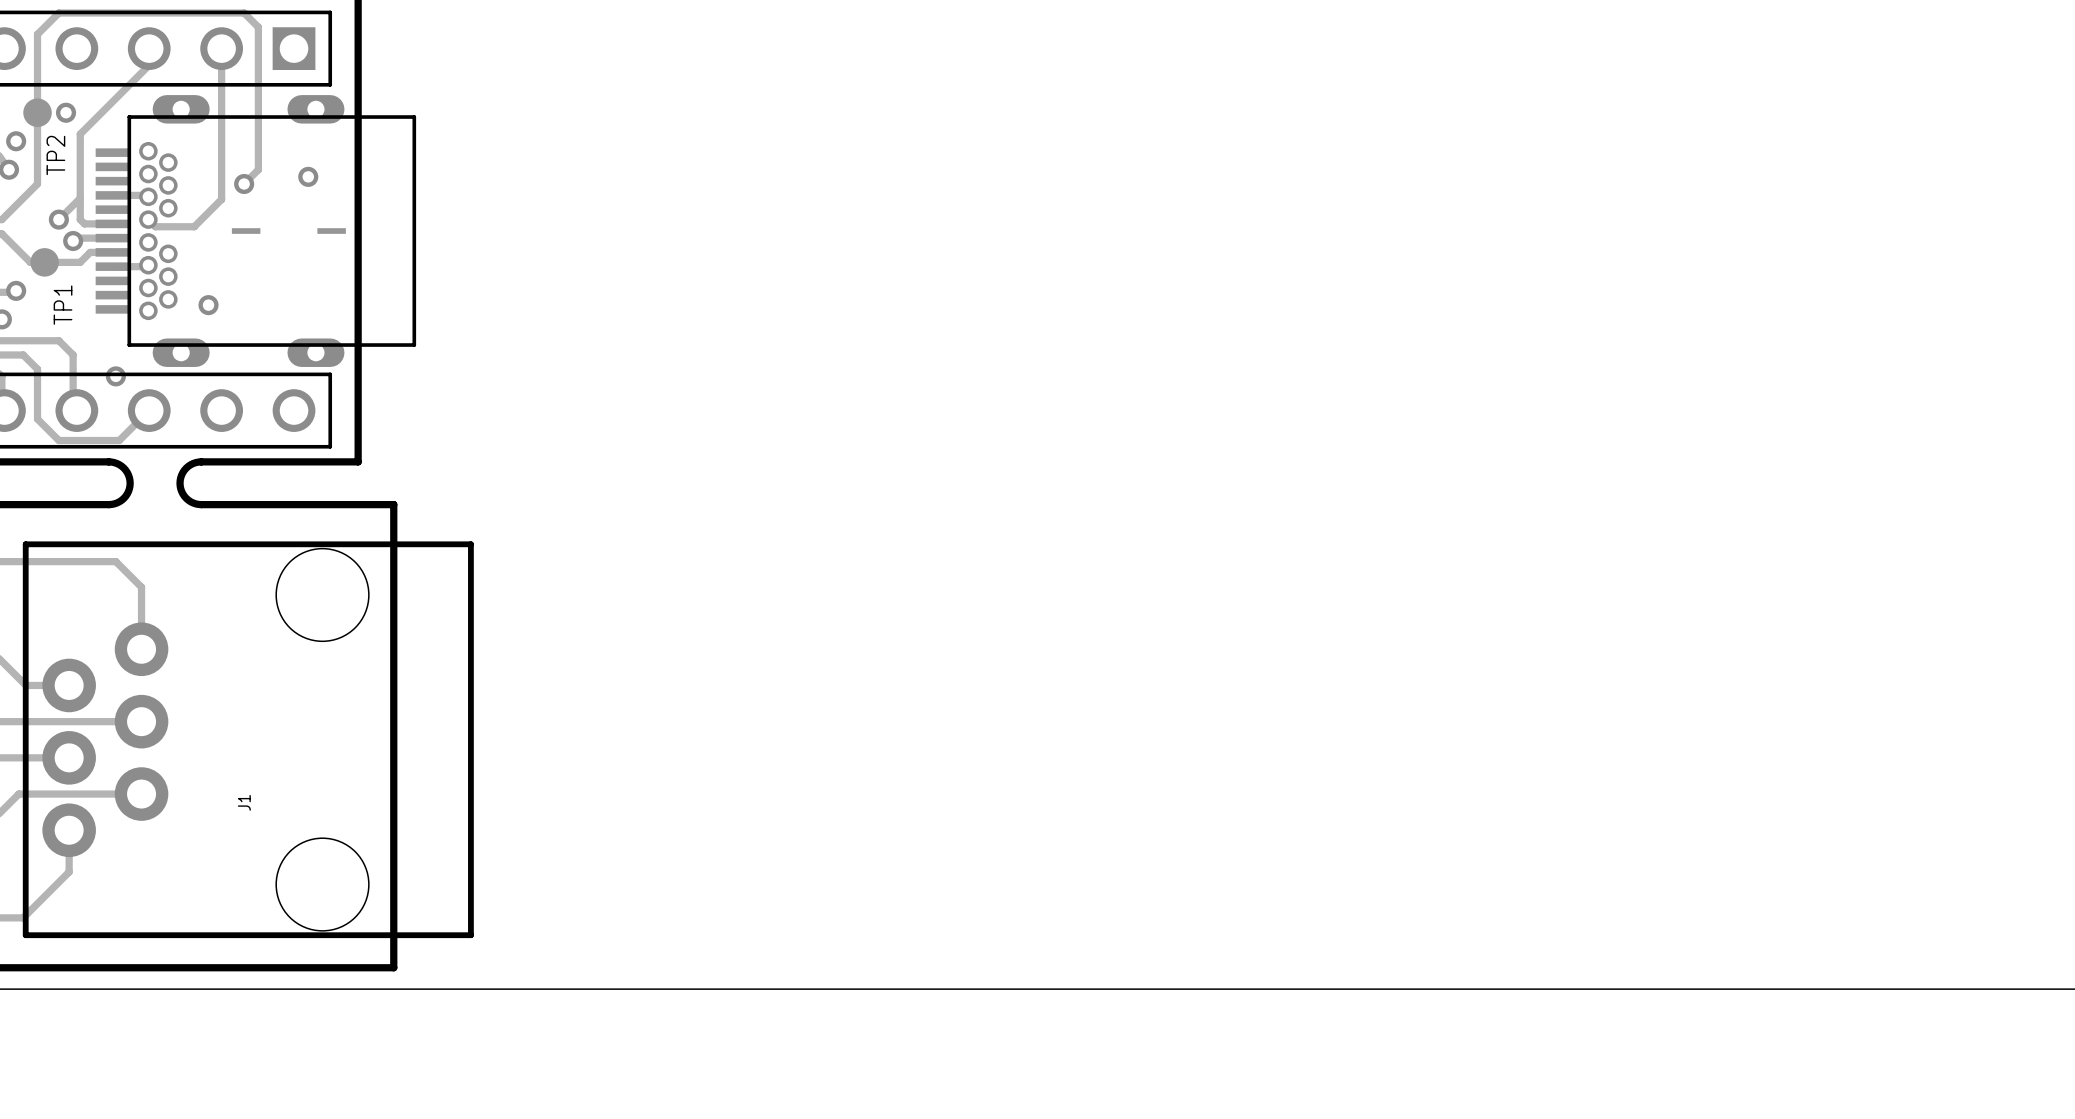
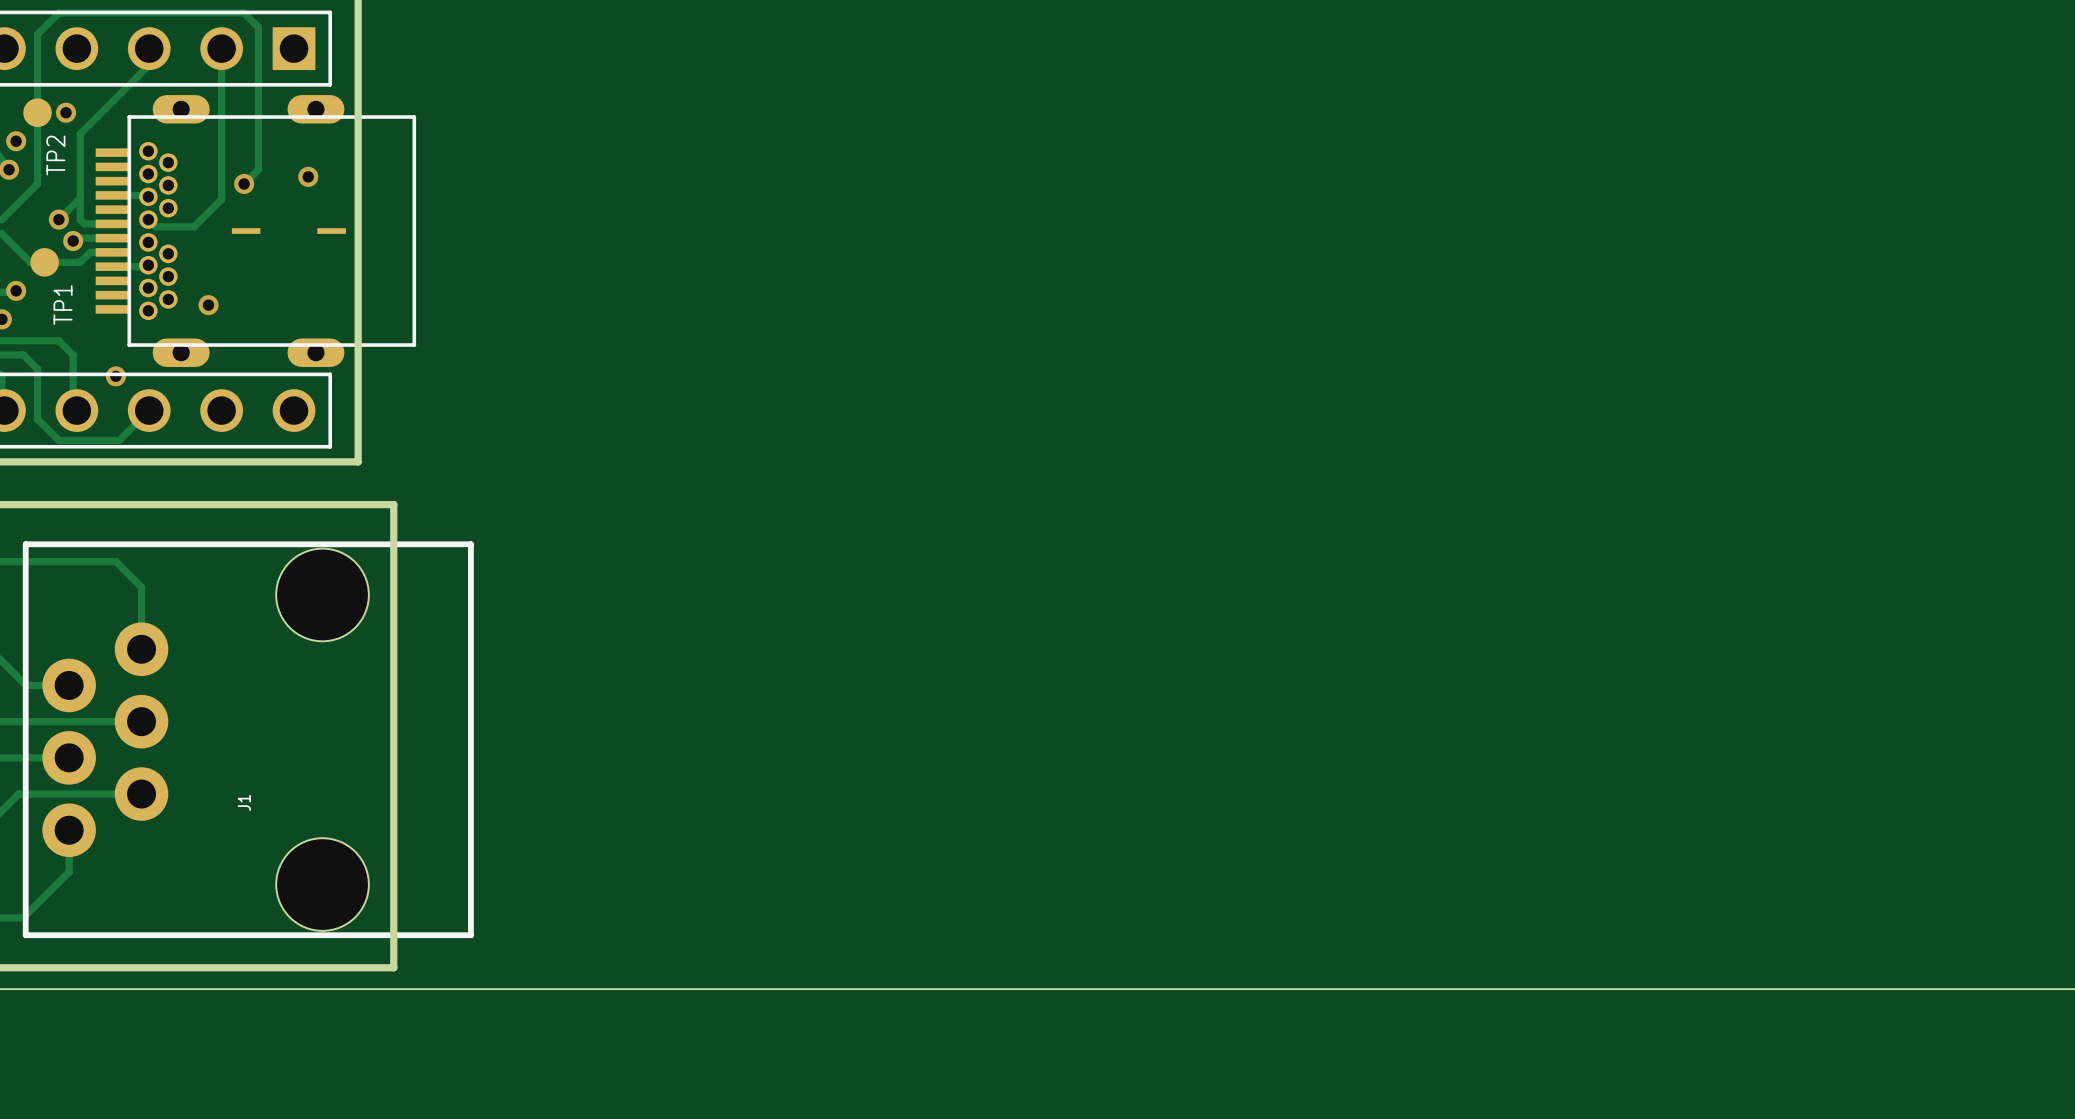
board edge: (108, 461) (116, 463) (123, 468) (128, 475) (130, 483) (128, 491) (123, 498) (116, 503) (108, 504) -> (108, 461) (201, 461)
board edge: (201, 461) (193, 463) (186, 468) (181, 475) (180, 483) (181, 491) (186, 498) (193, 503) (201, 504) -> (108, 504) (201, 504)

